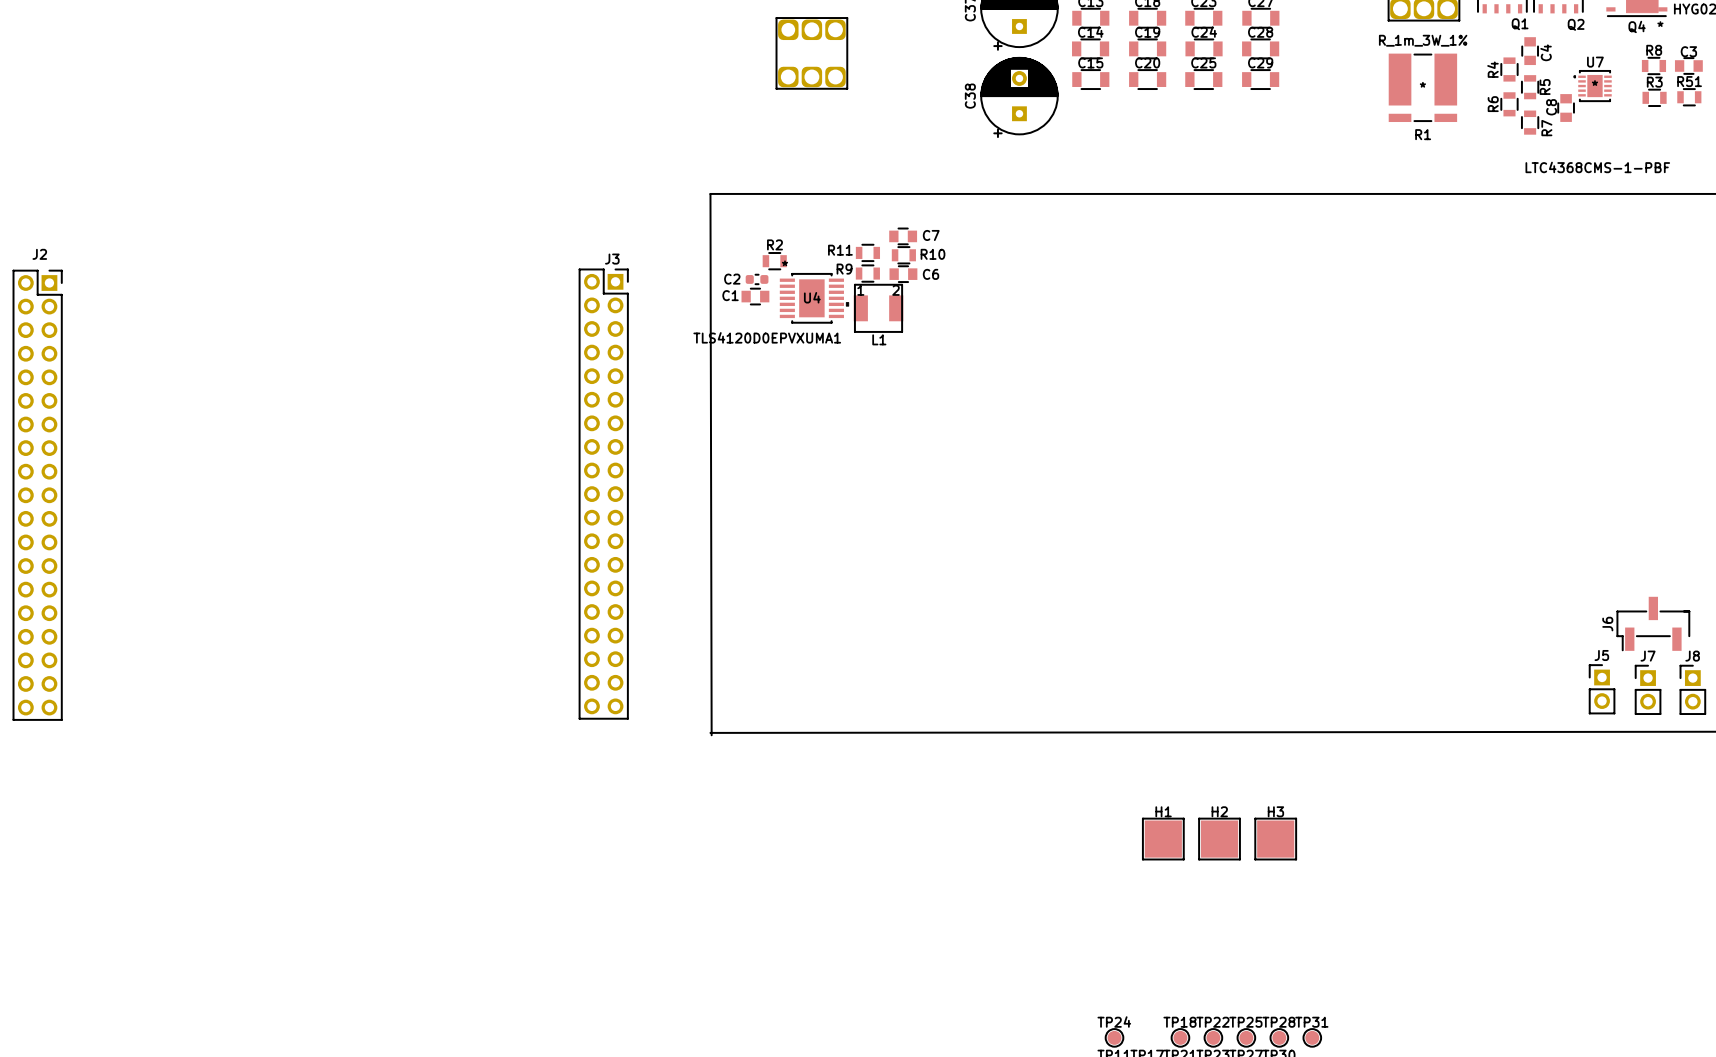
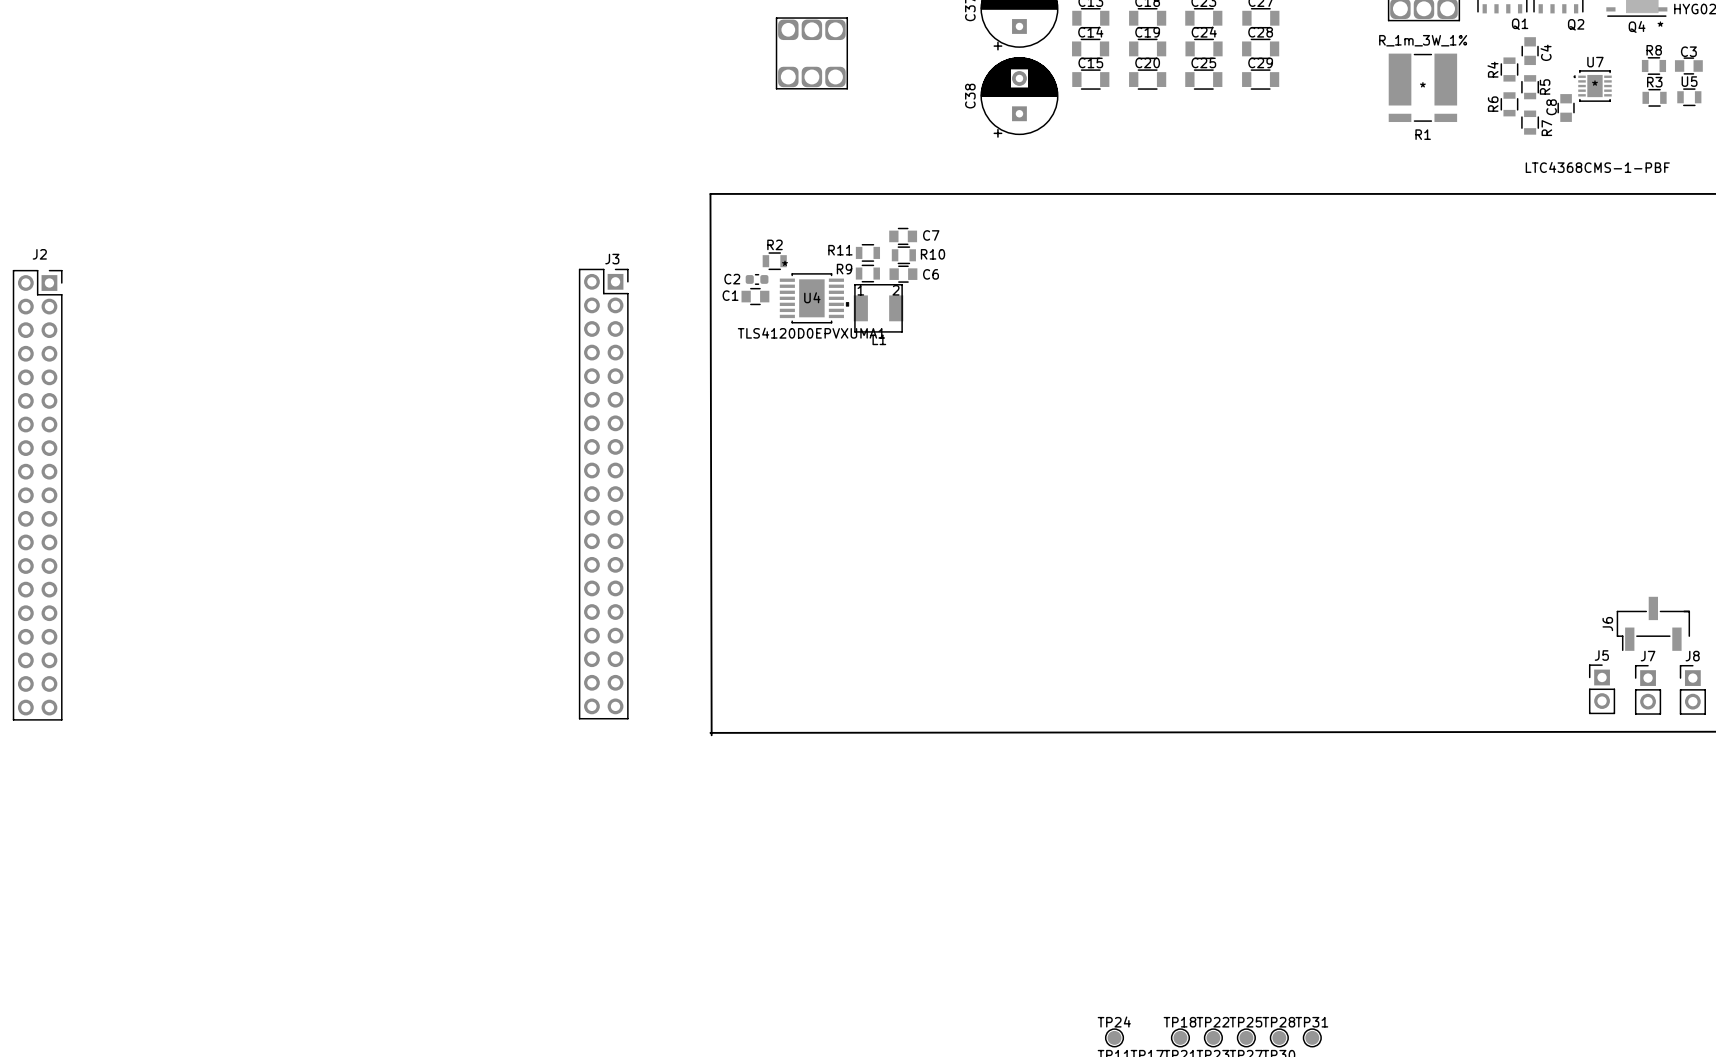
R51 name: R51 (1689, 81) -> U5 (1689, 81)
U4 value position: TLS4120D0EPVXUMA1 (767, 337) -> TLS4120D0EPVXUMA1 (811, 333)
H1: (1163, 839) -> none
H2: (1219, 839) -> none
H3: (1275, 839) -> none

